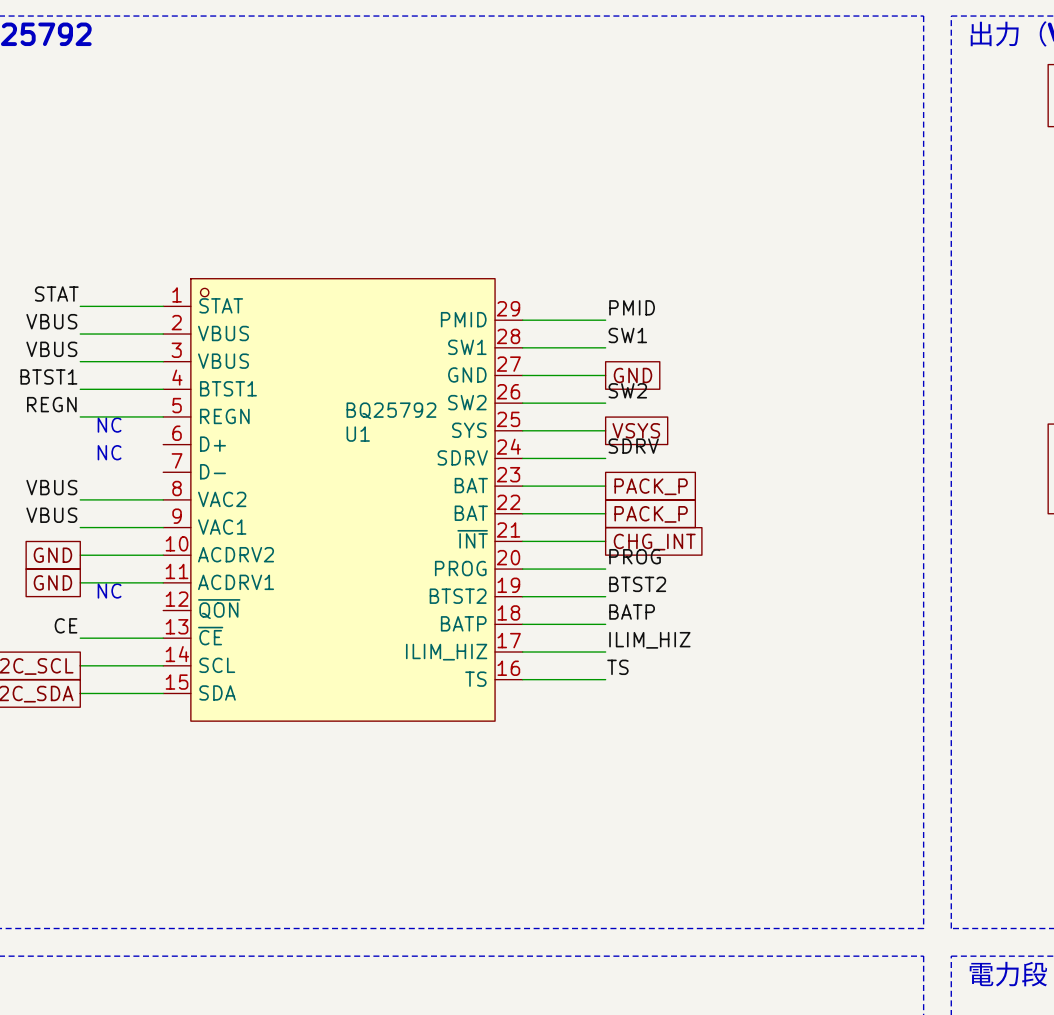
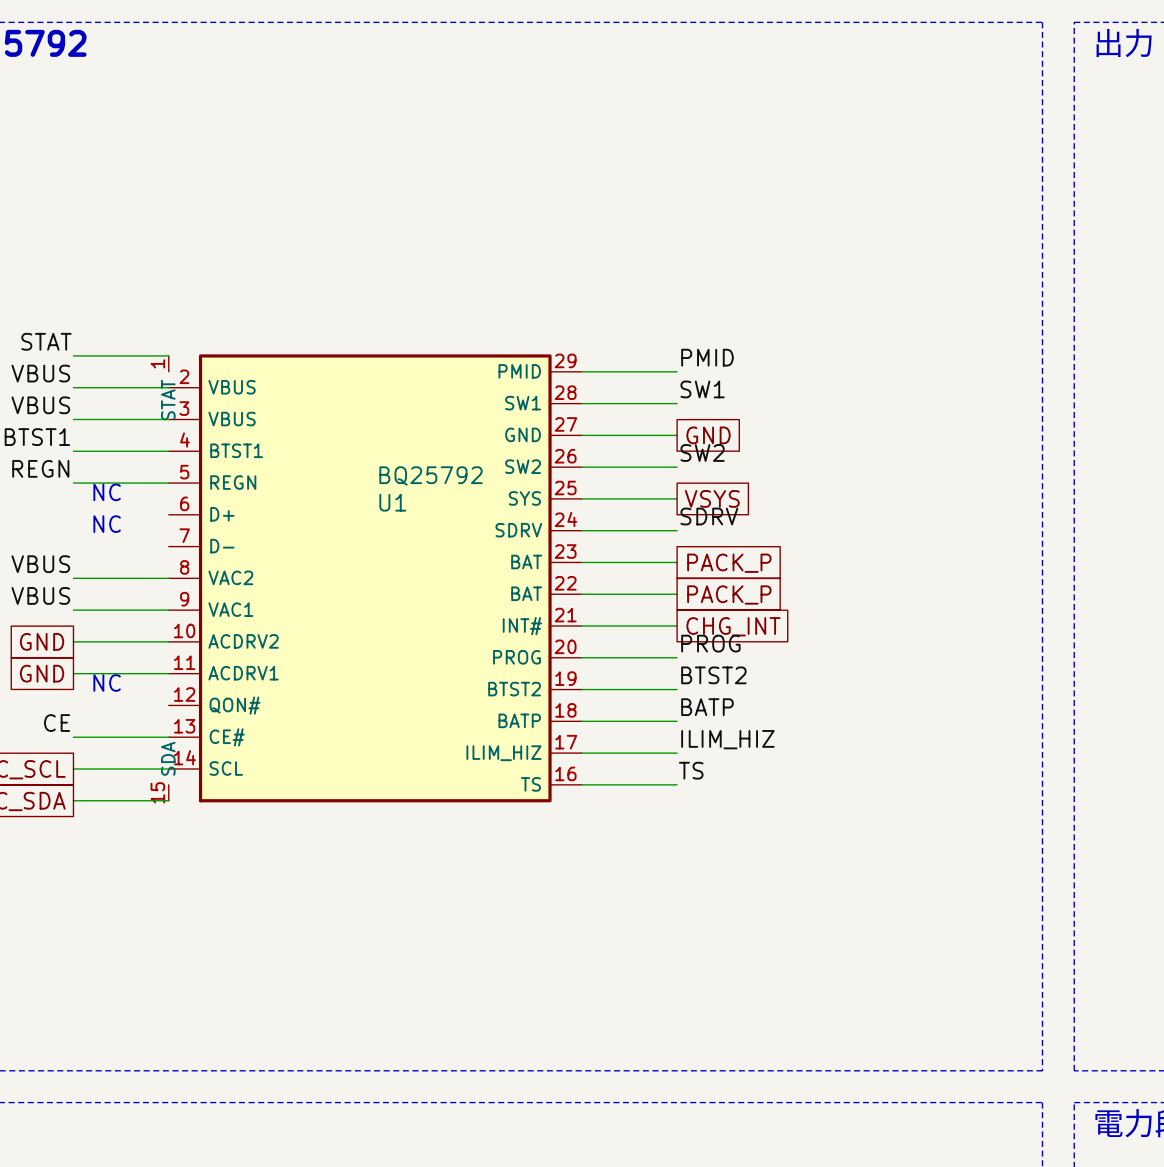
U1 symbol: [163, 278, 523, 722] -> [168, 354, 582, 803]

